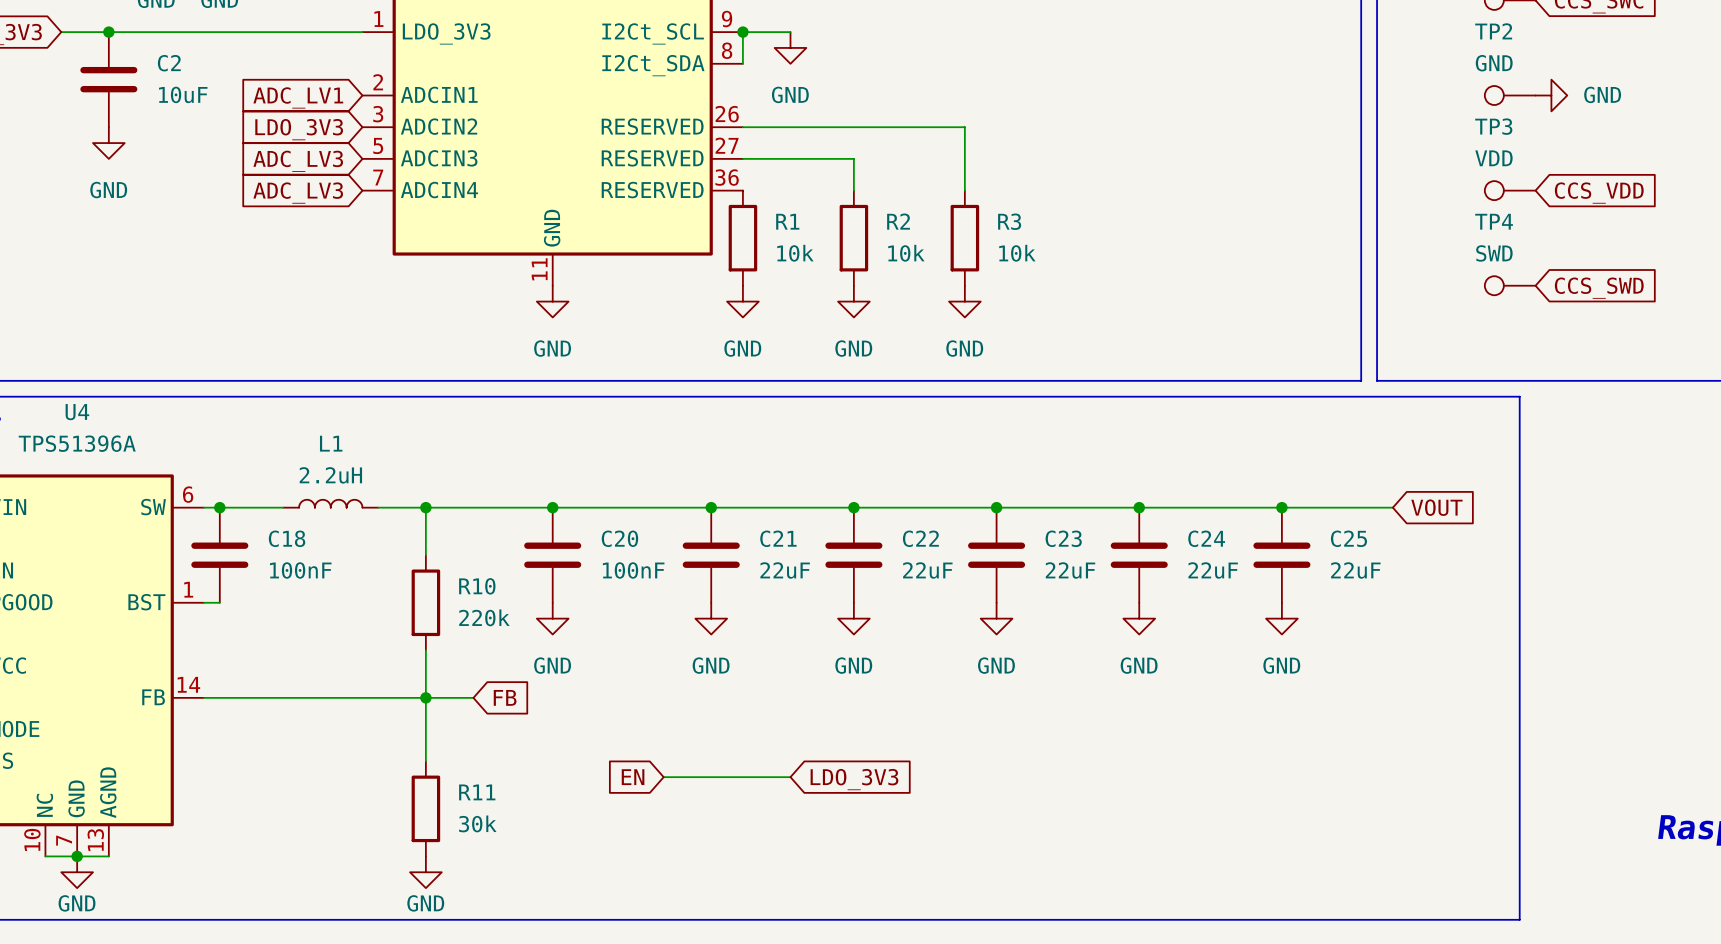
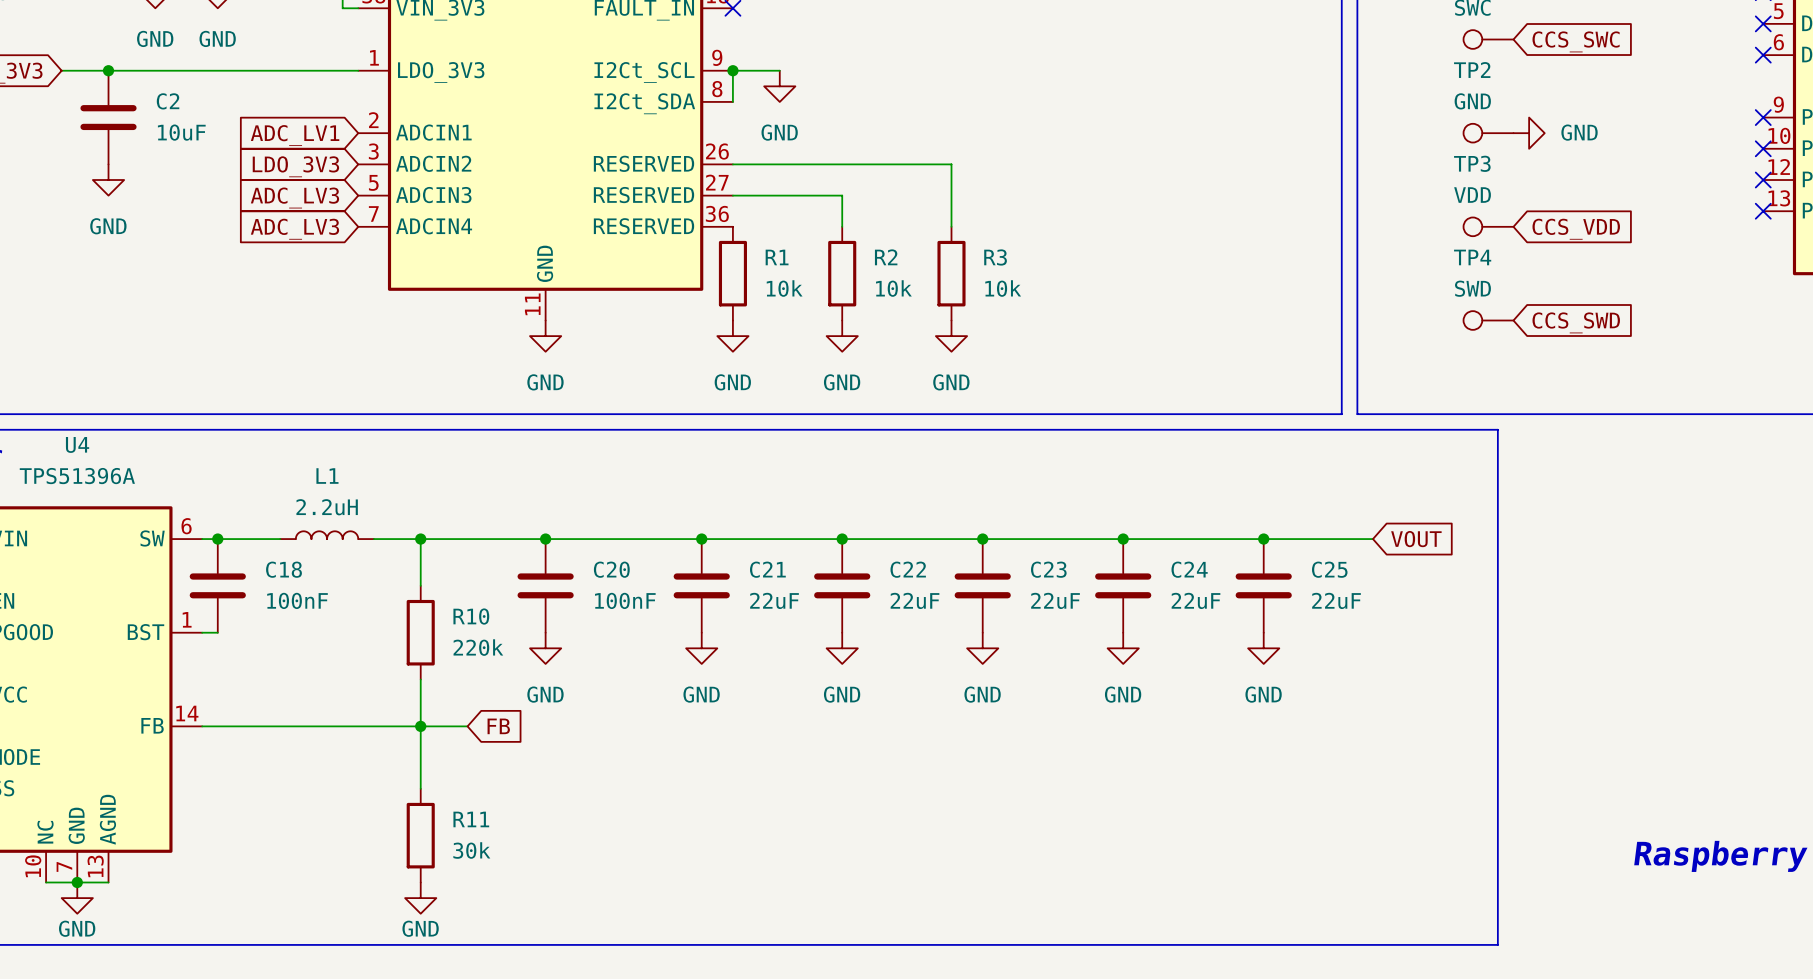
global label: EN (633, 777) -> none
wire: (663, 777) (790, 777) -> none
global label: LDO_3V3 (854, 779) -> none

